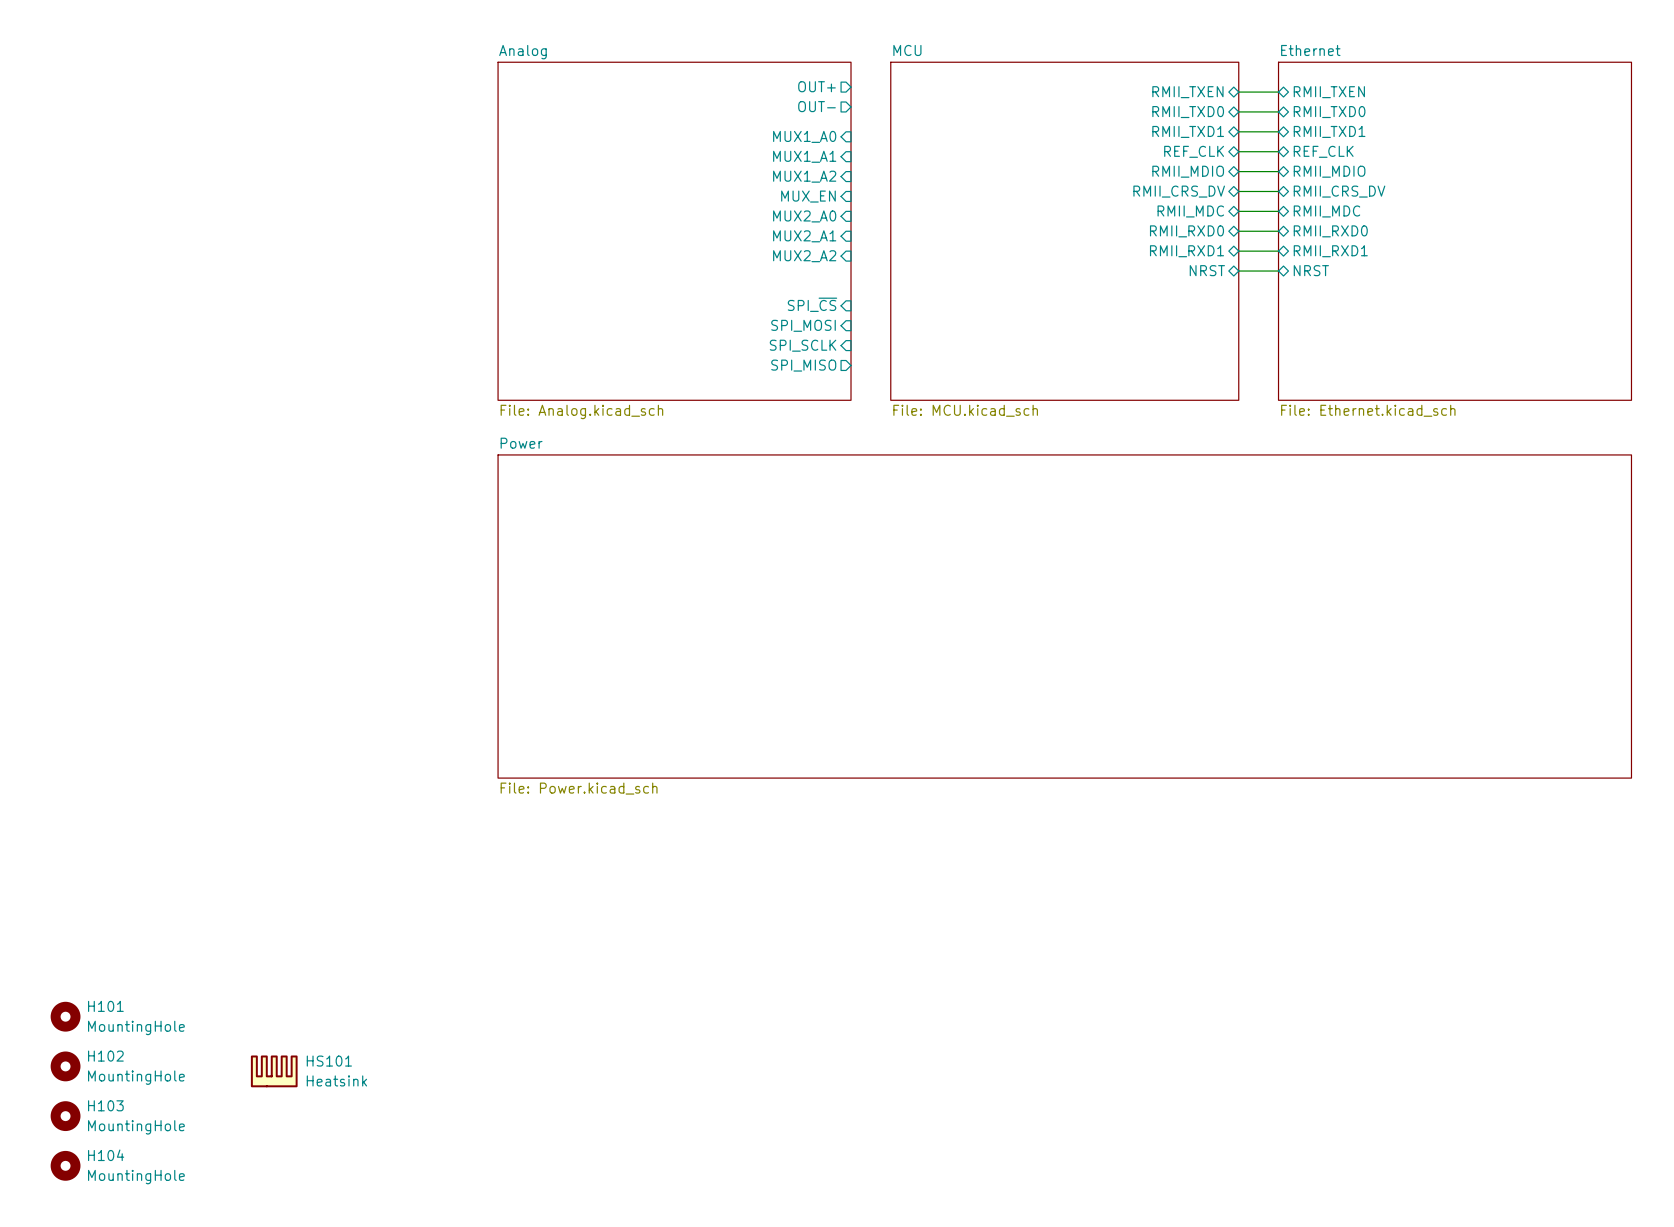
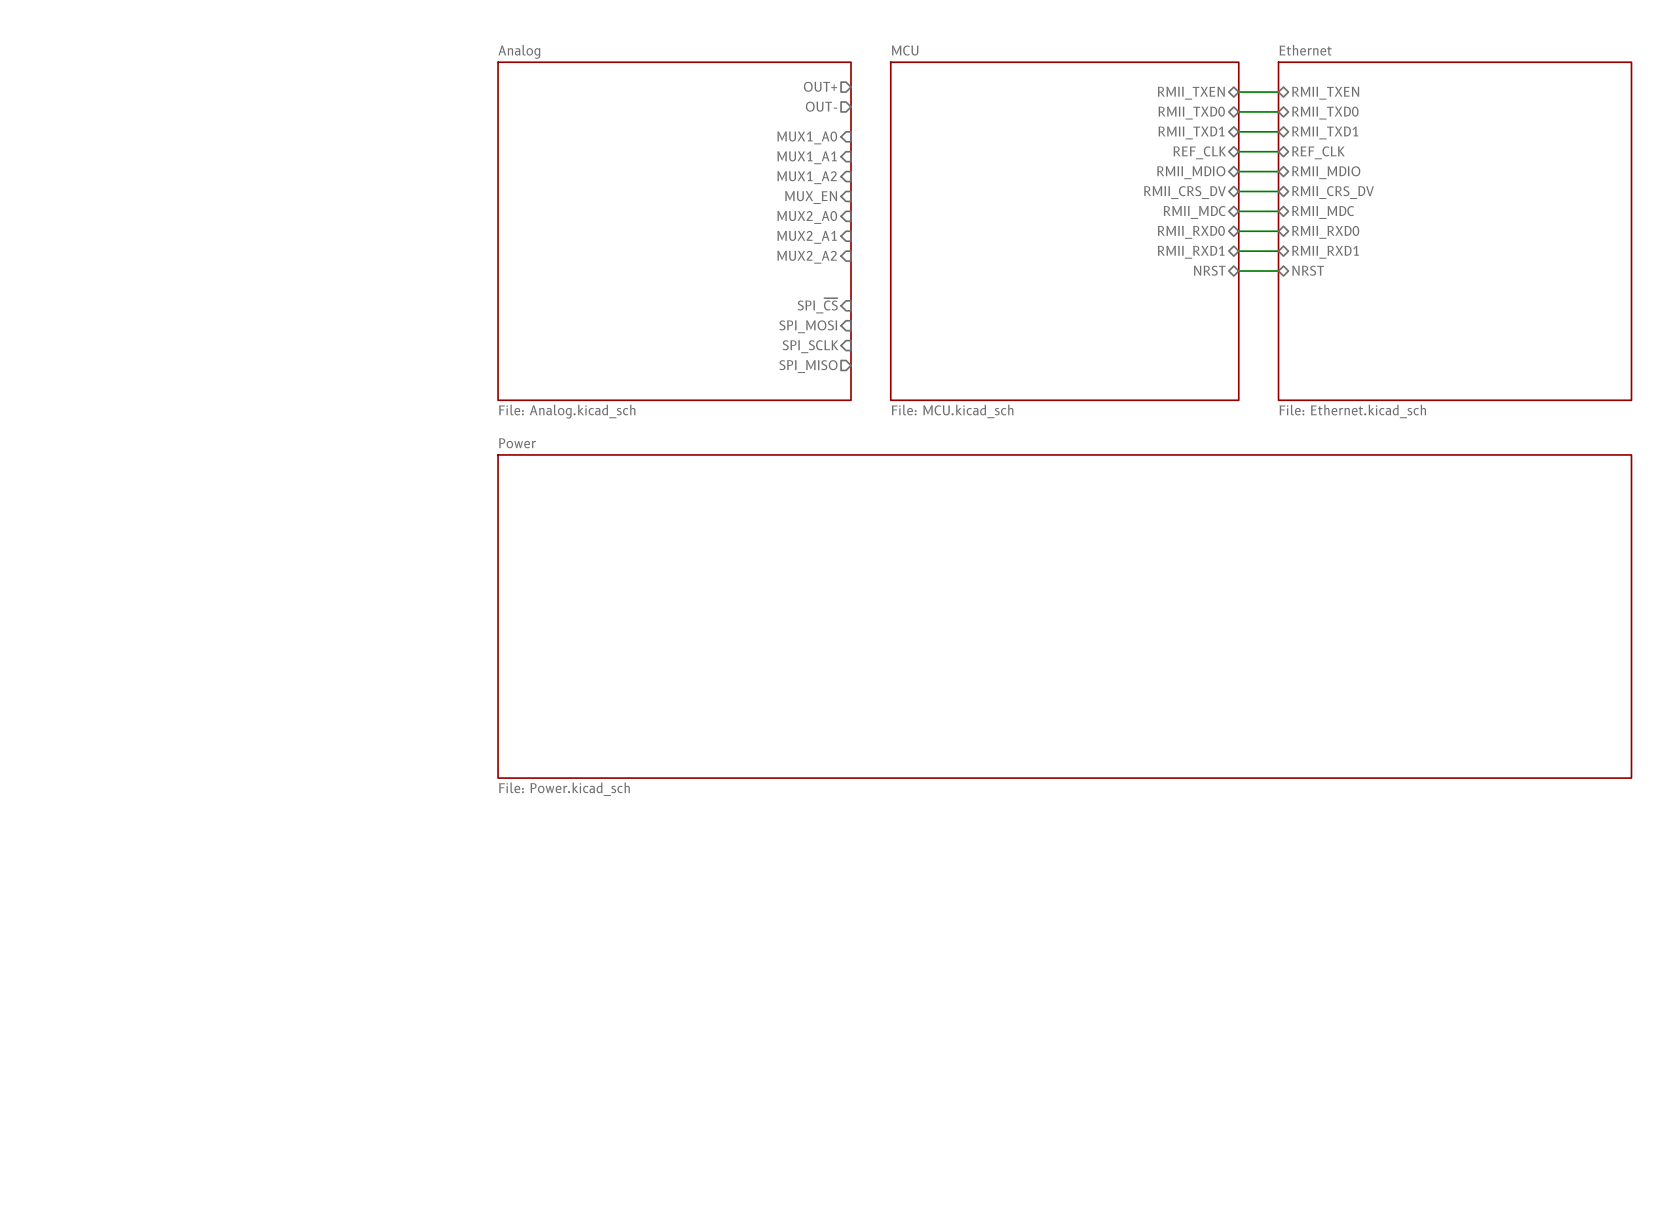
H101: MountingHole (65, 1016) -> none
H102: MountingHole (65, 1066) -> none
HS101: Heatsink (274, 1071) -> none
H103: MountingHole (65, 1116) -> none
H104: MountingHole (65, 1165) -> none

